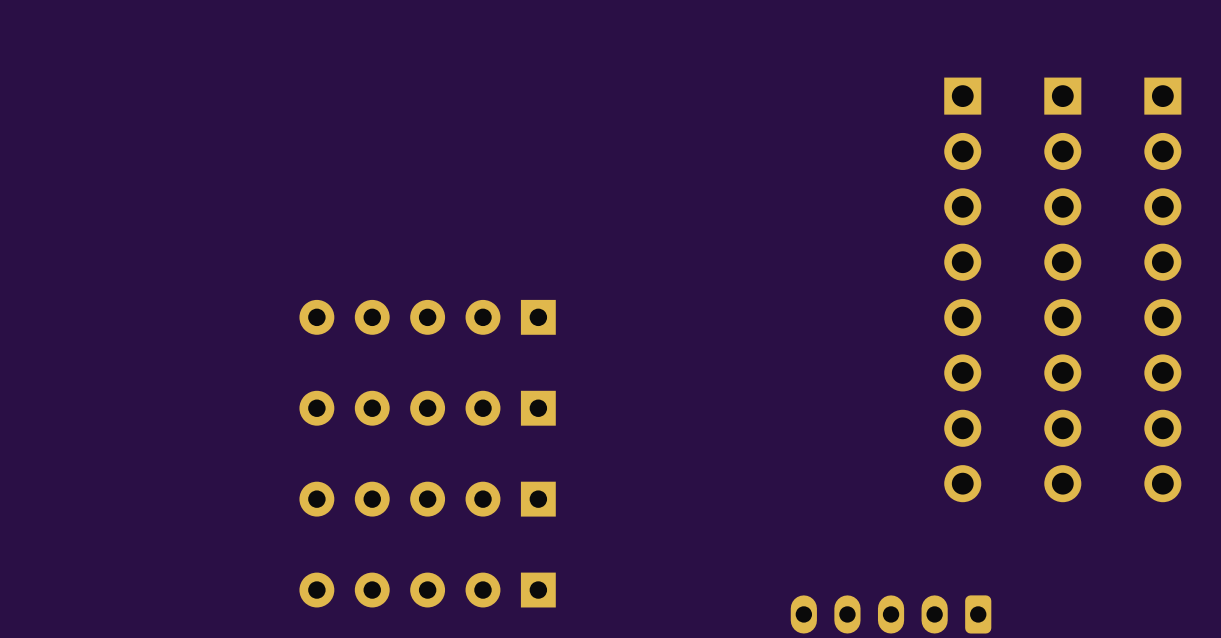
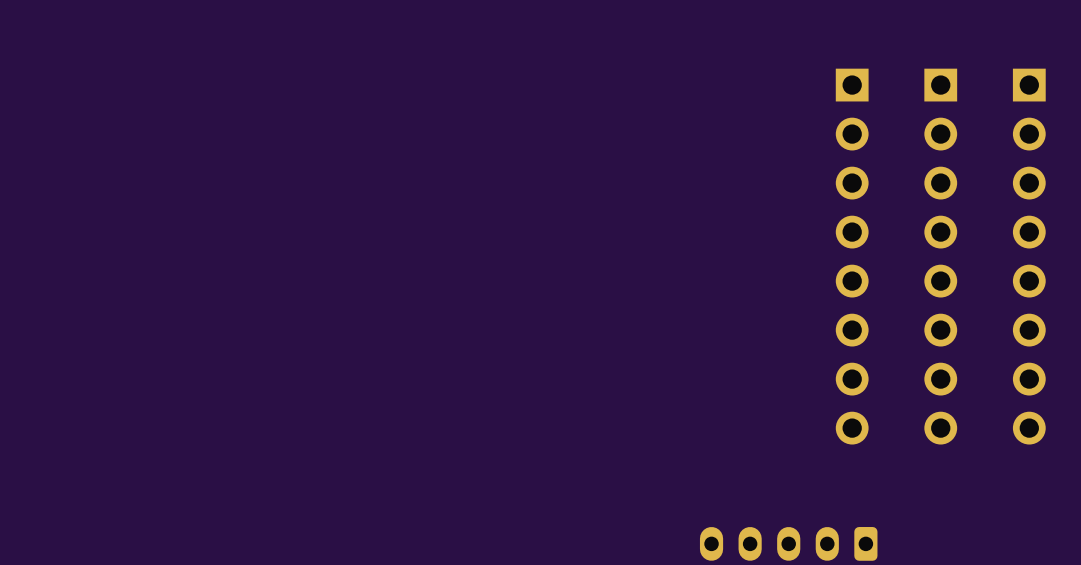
part: (427, 317) -> none
part: (427, 408) -> none
part: (427, 499) -> none
part: (427, 590) -> none

